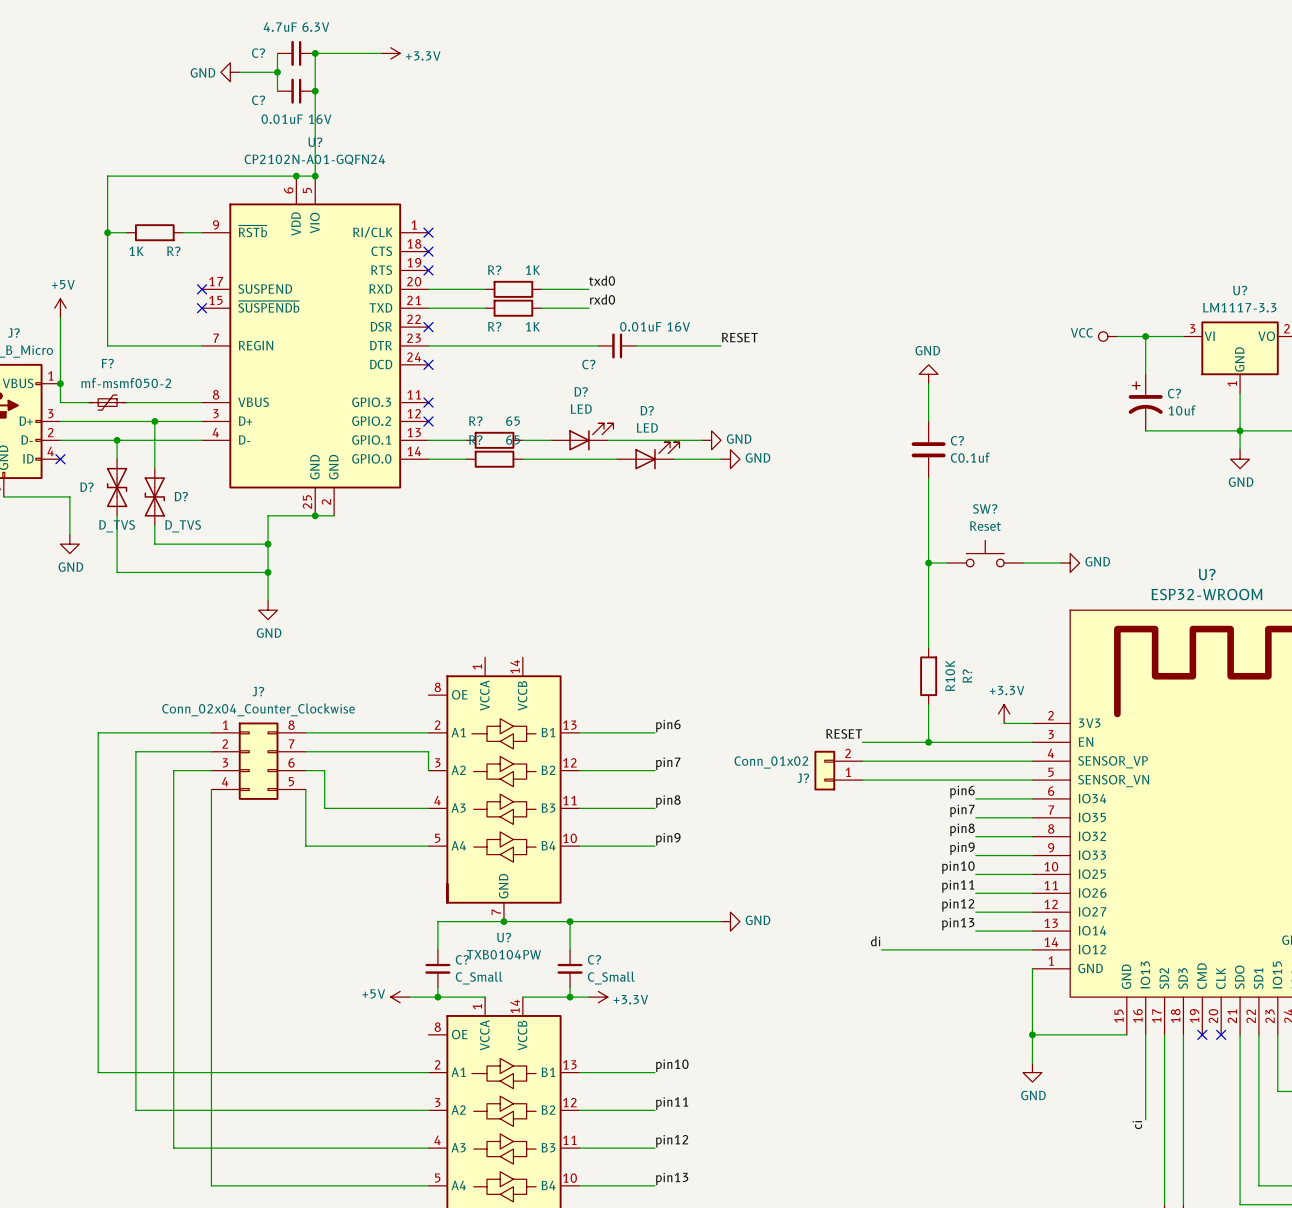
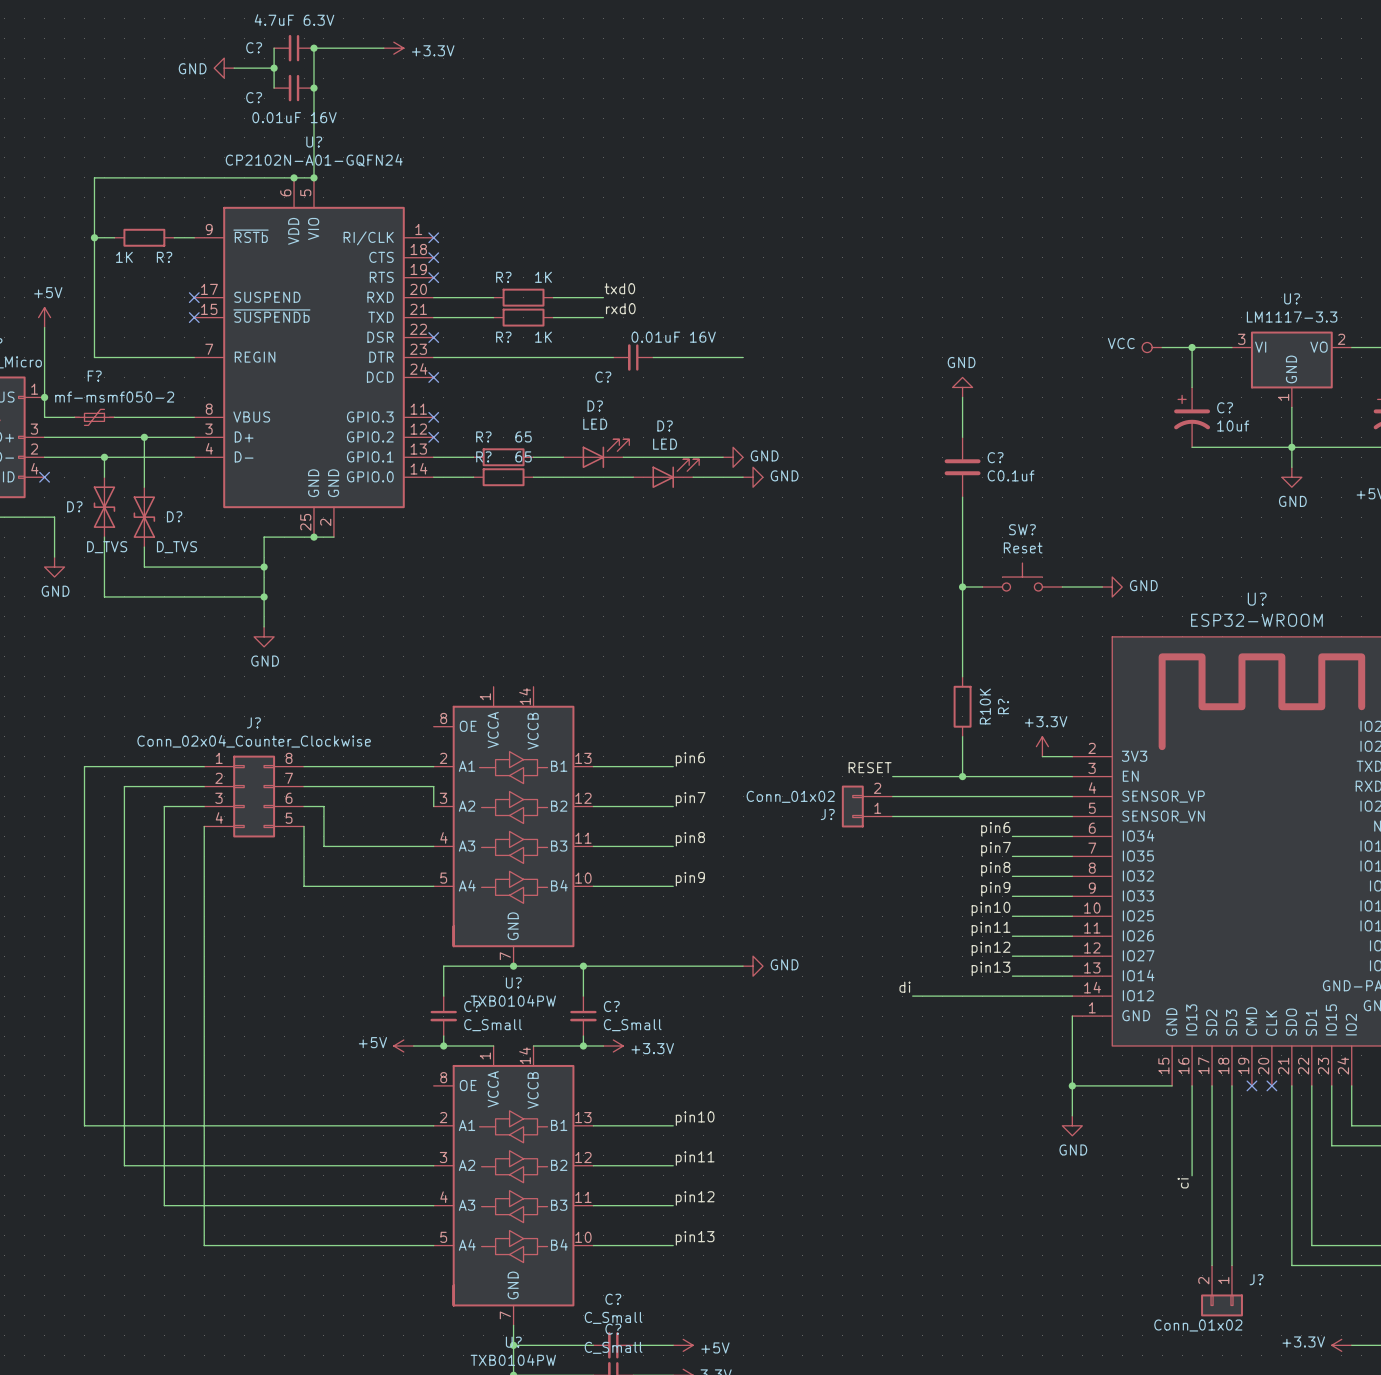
label: RESET (739, 337) -> none

